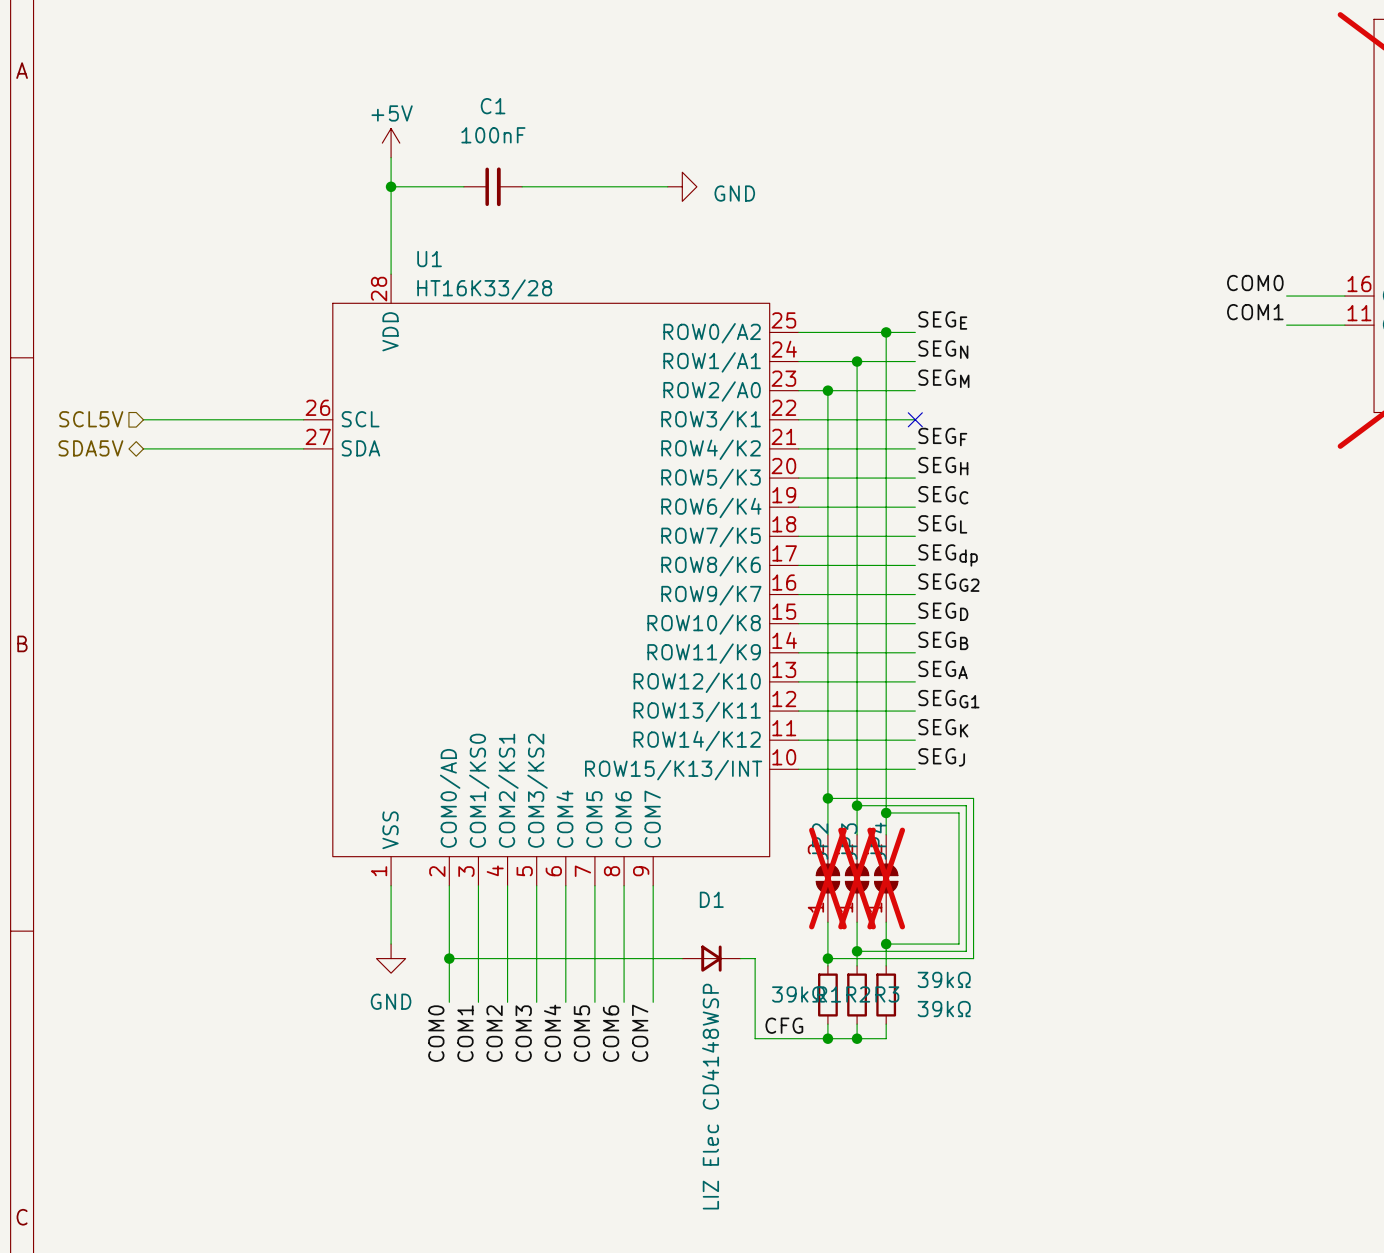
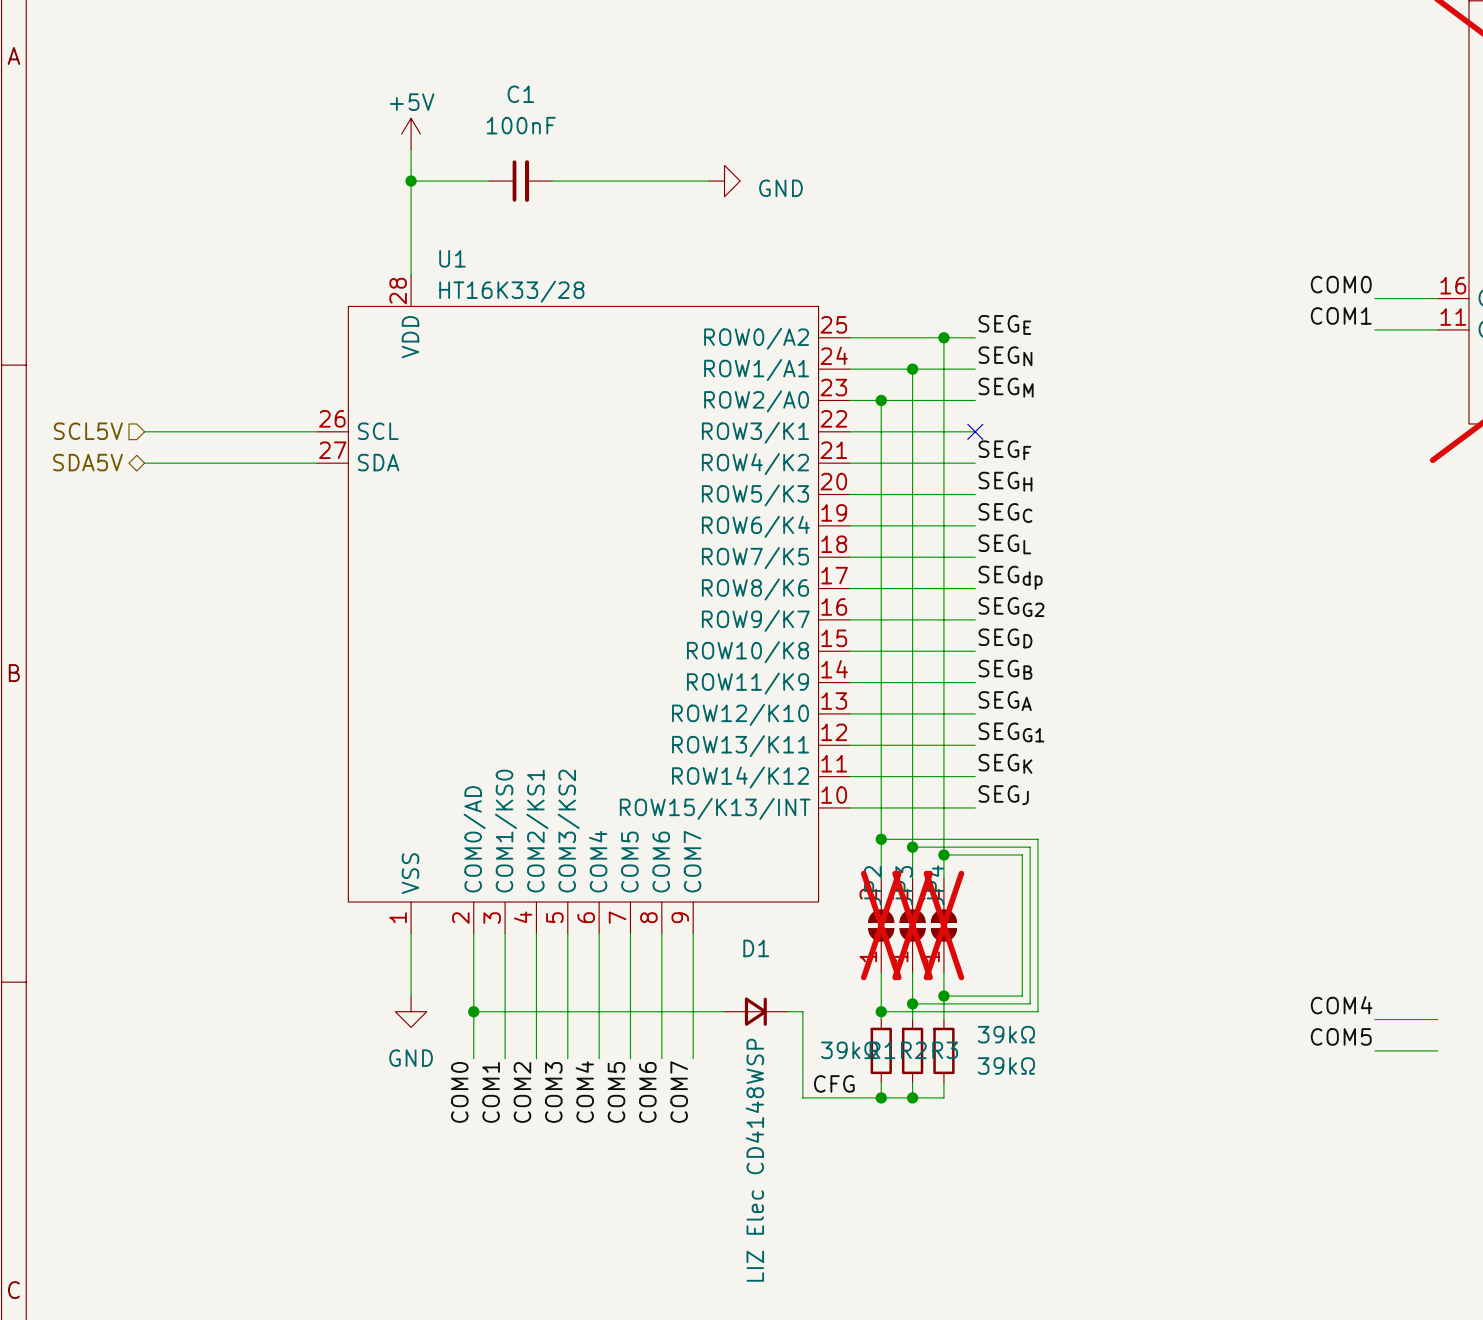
label: none -> COM4 (1341, 1005)
wire: none -> (1374, 1019) (1437, 1019)
label: none -> COM5 (1341, 1036)
wire: none -> (1374, 1050) (1437, 1050)

